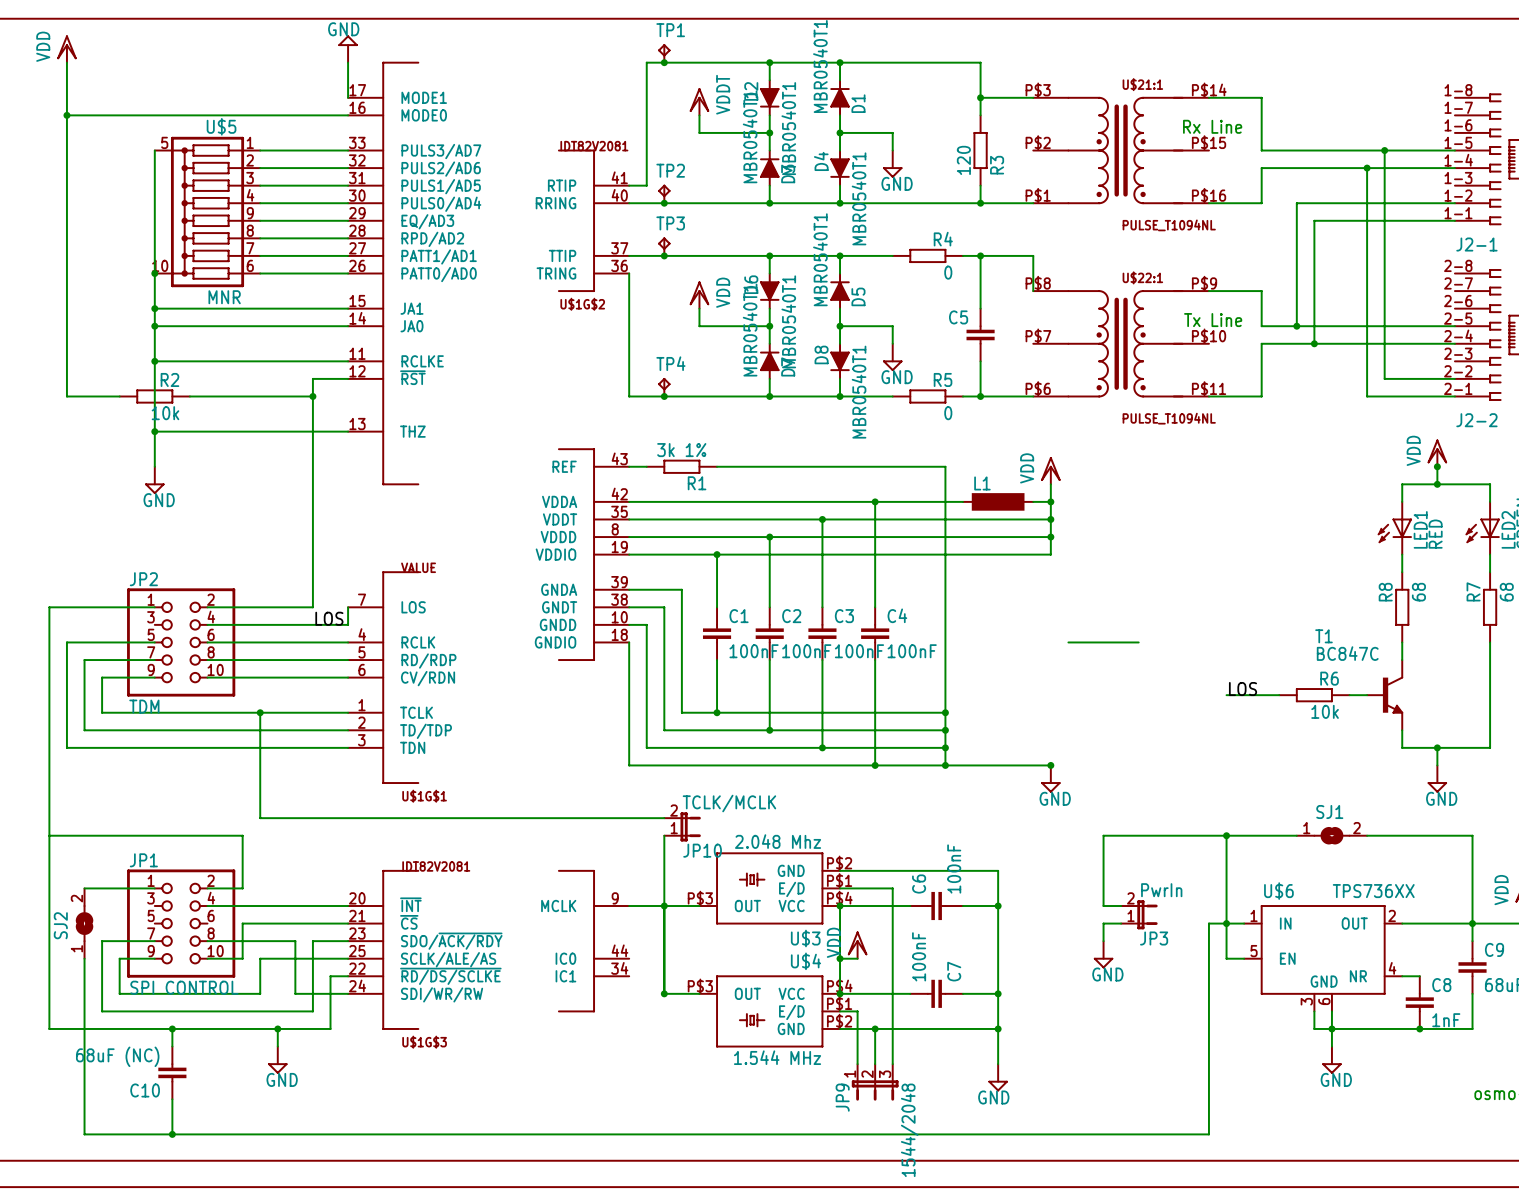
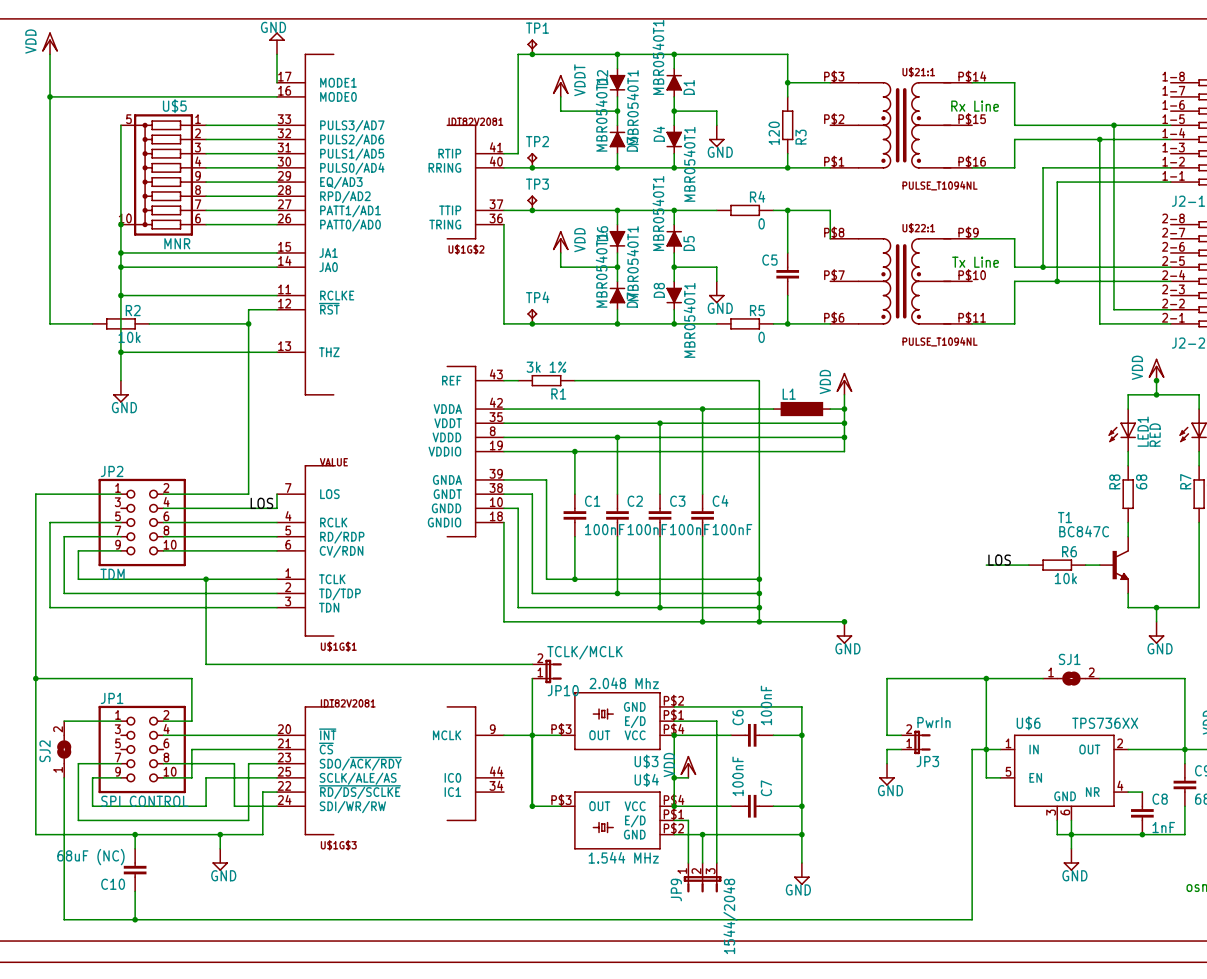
wire: (1068, 642) (1138, 642) -> none
junction: none -> (35, 678)

